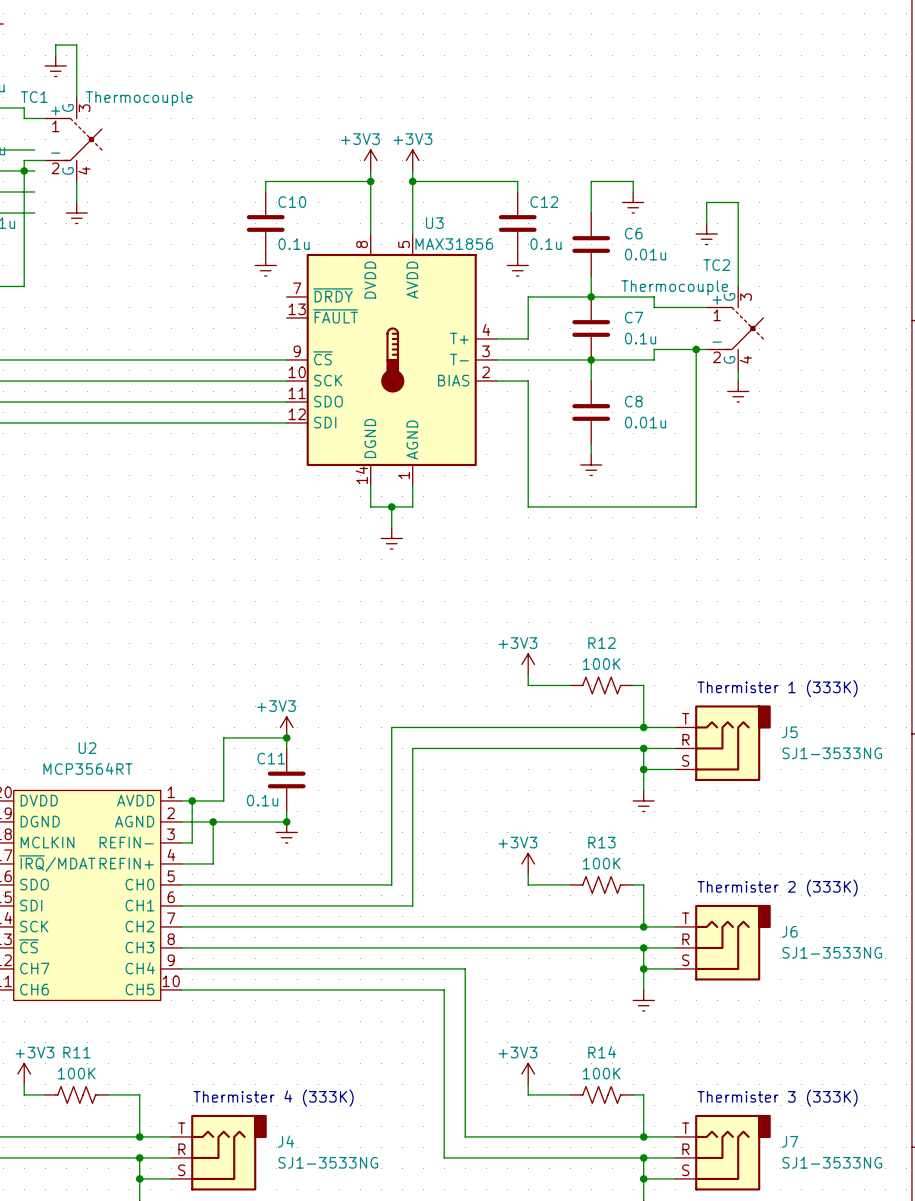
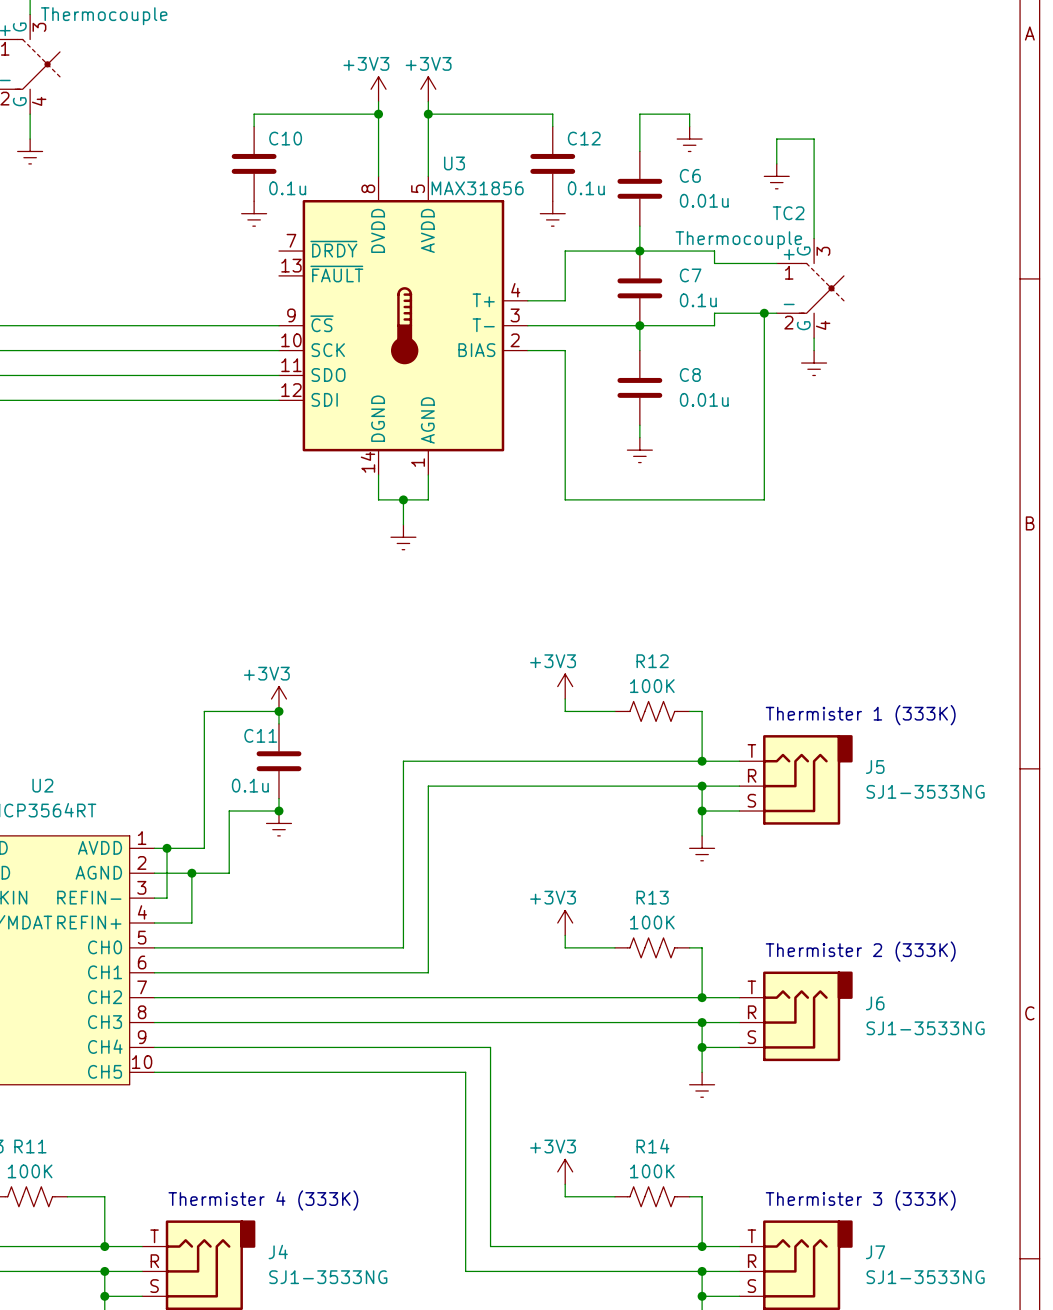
junction: none -> (279, 711)
power symbol position: +3V3 (286, 727) -> +3V3 (279, 699)
wire: (223, 737) (286, 737) (286, 748) -> (204, 773) (204, 711) (279, 711) (279, 723)
junction: (286, 737) -> none
junction: none -> (279, 811)
C11 position: (286, 779) -> (279, 761)
wire: (286, 811) (286, 821) (244, 821) -> (279, 798) (279, 811) (229, 811) (229, 873)
junction: (286, 821) -> none
power symbol position: (286, 832) -> (279, 823)

